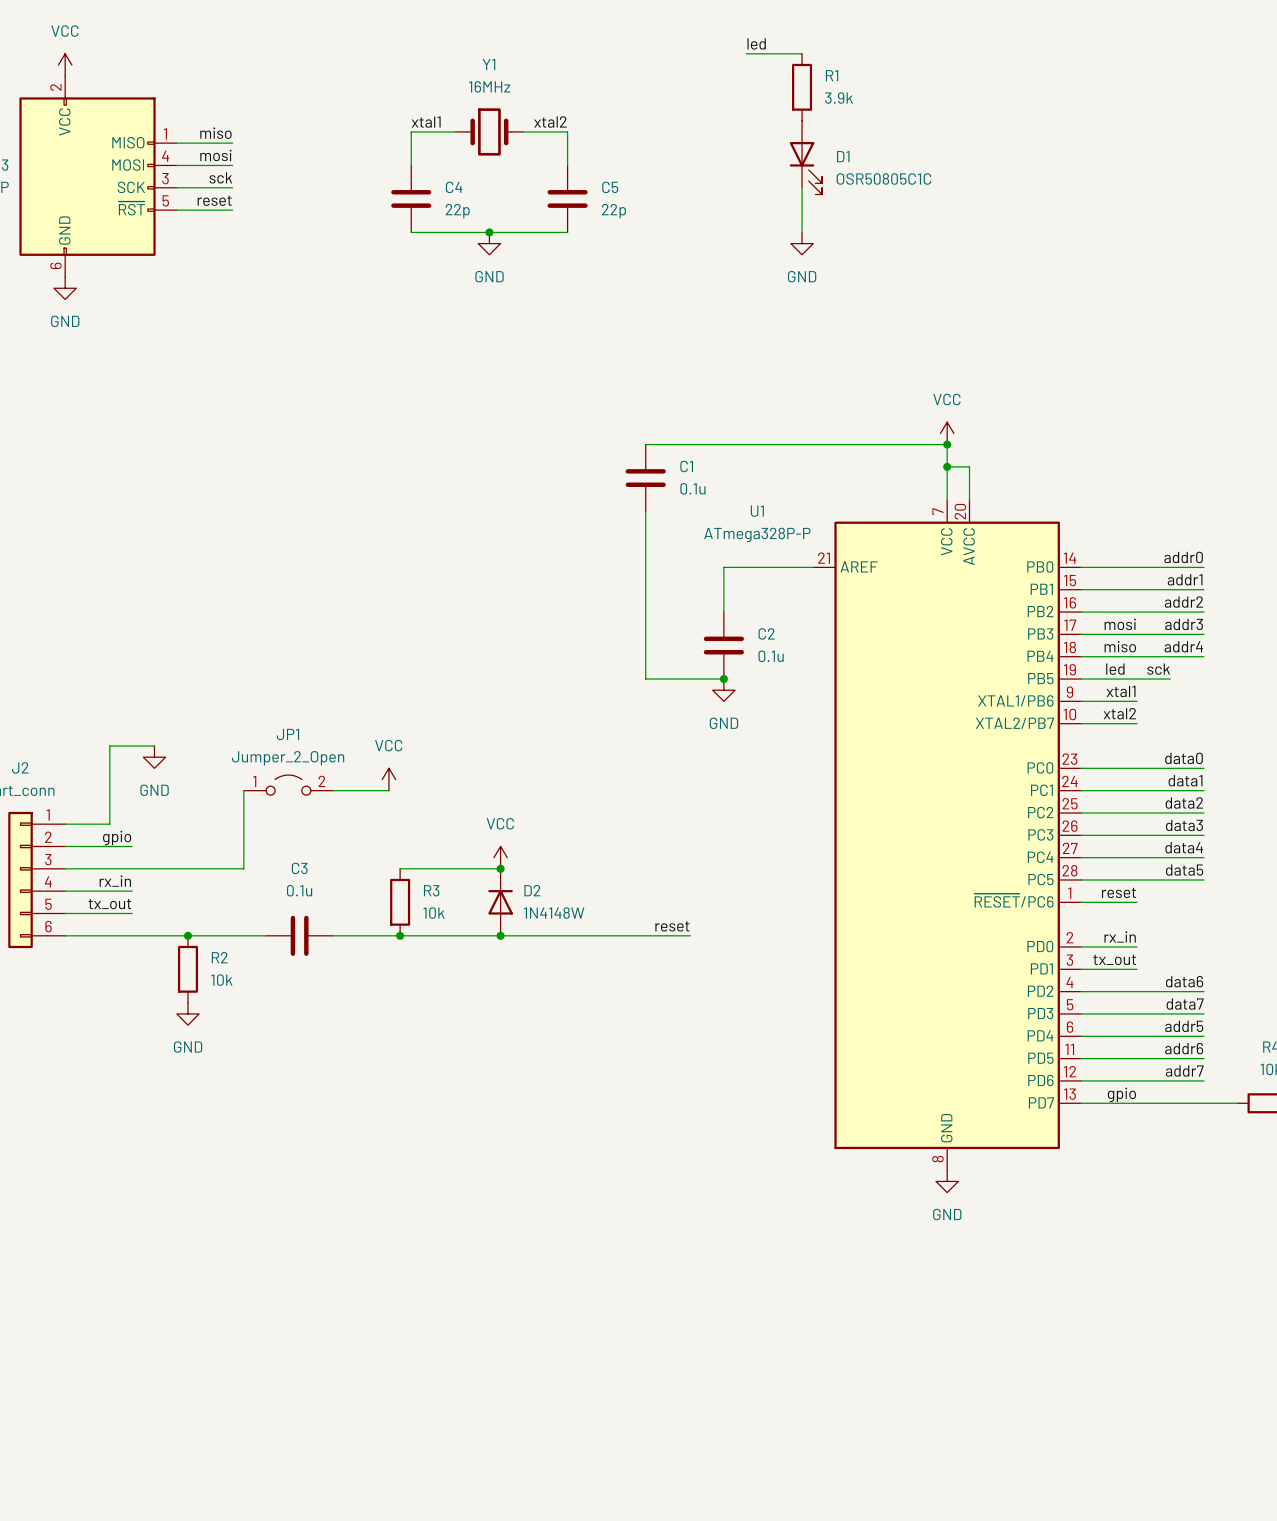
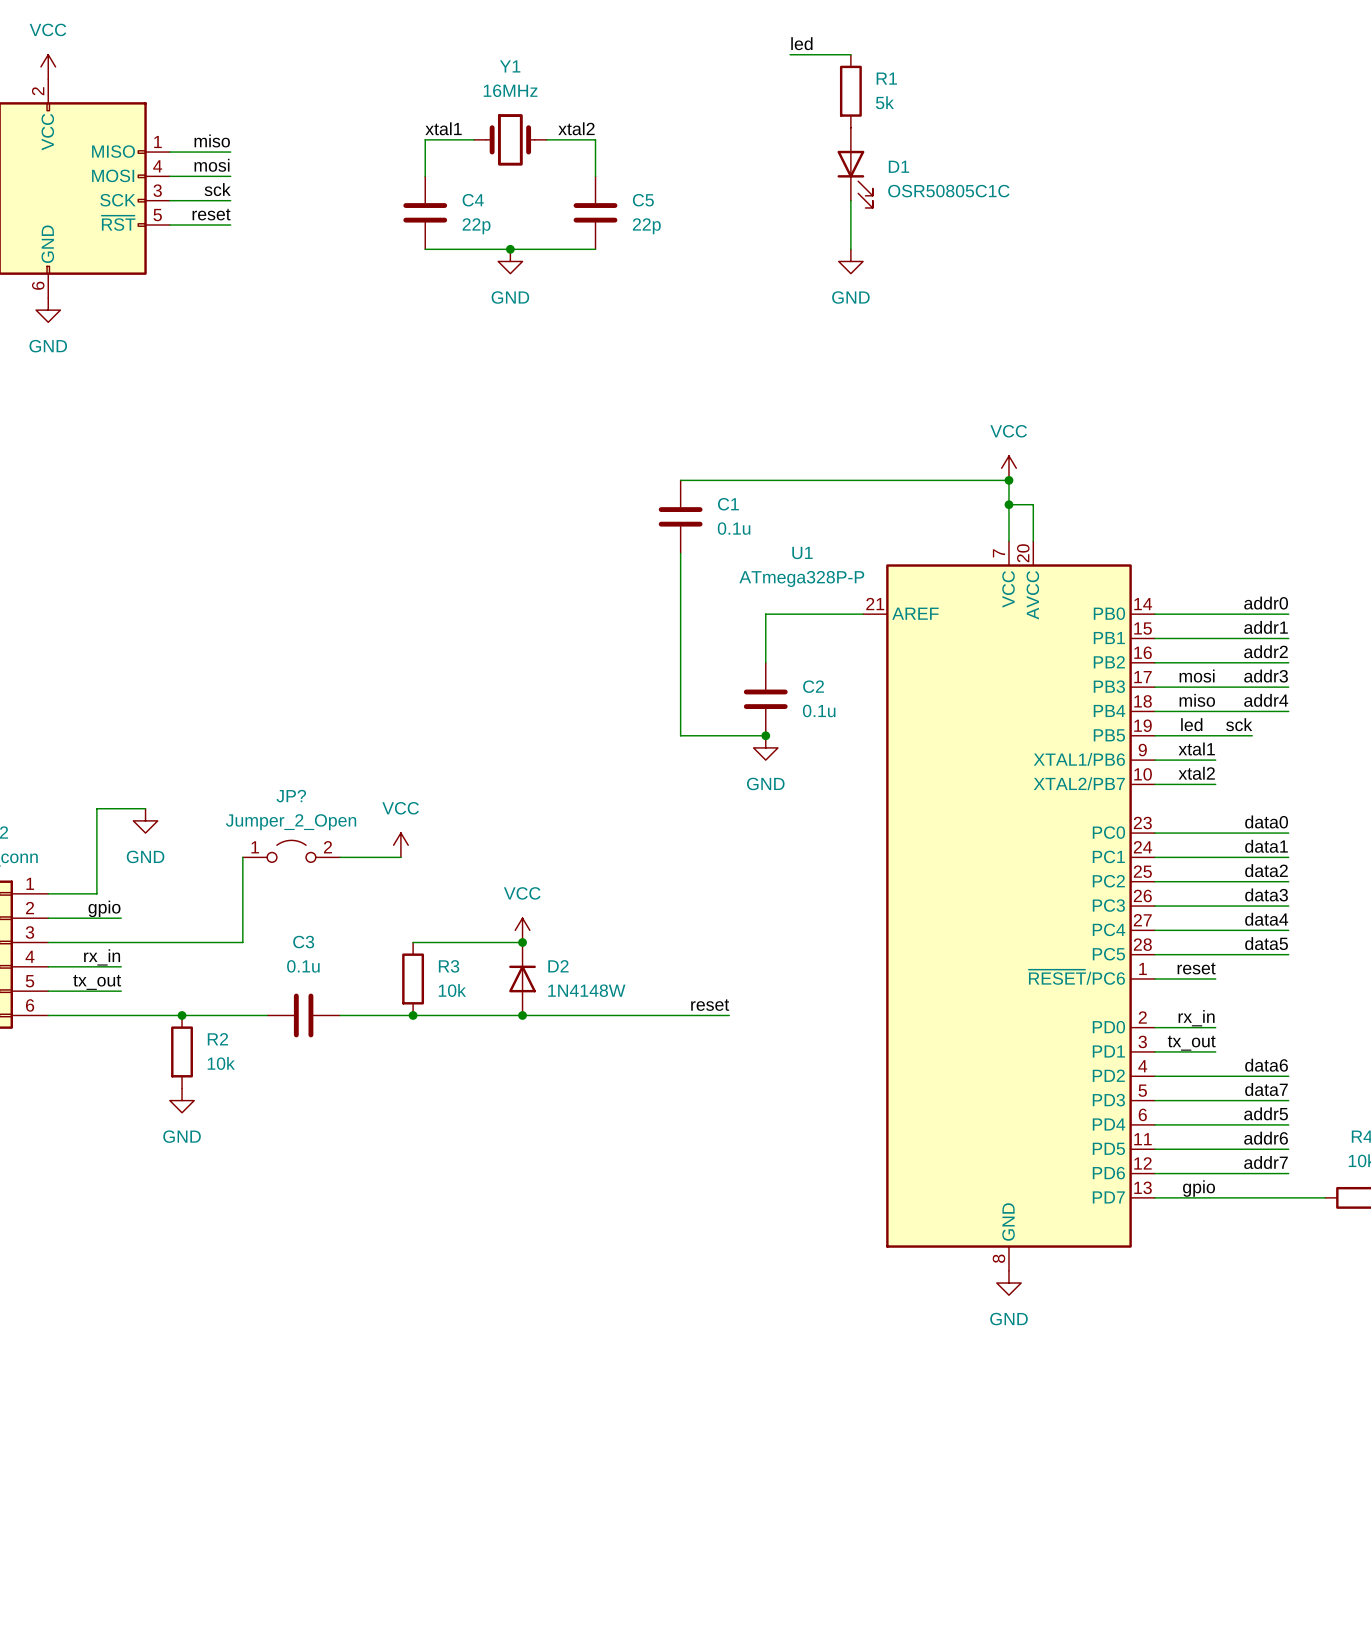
R1 value: 3.9k (839, 98) -> 5k (884, 102)
JP1 name: JP1 (287, 734) -> JP? (291, 796)

